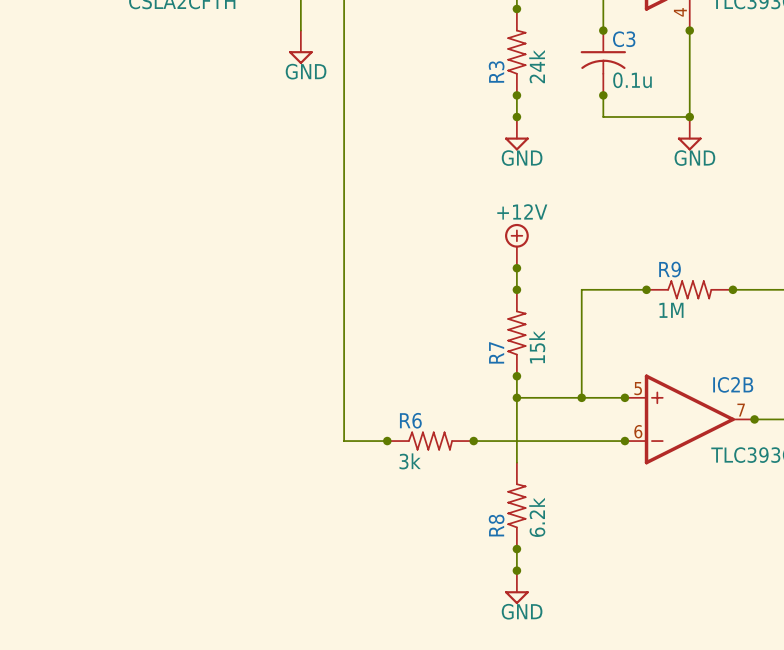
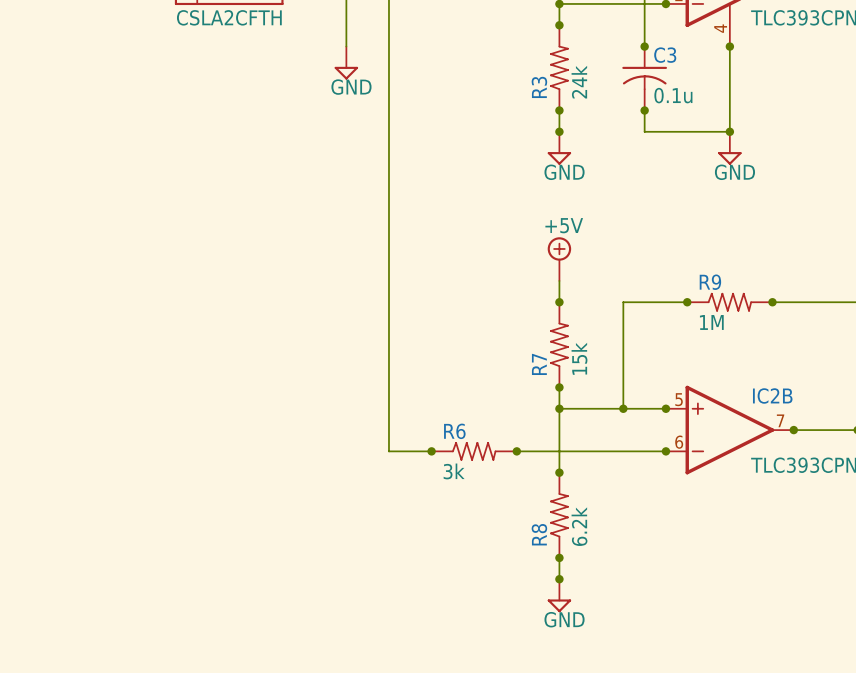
power symbol: +12V (516, 246) -> +5V (559, 259)
junction: (516, 268) -> none
junction: none -> (559, 472)

